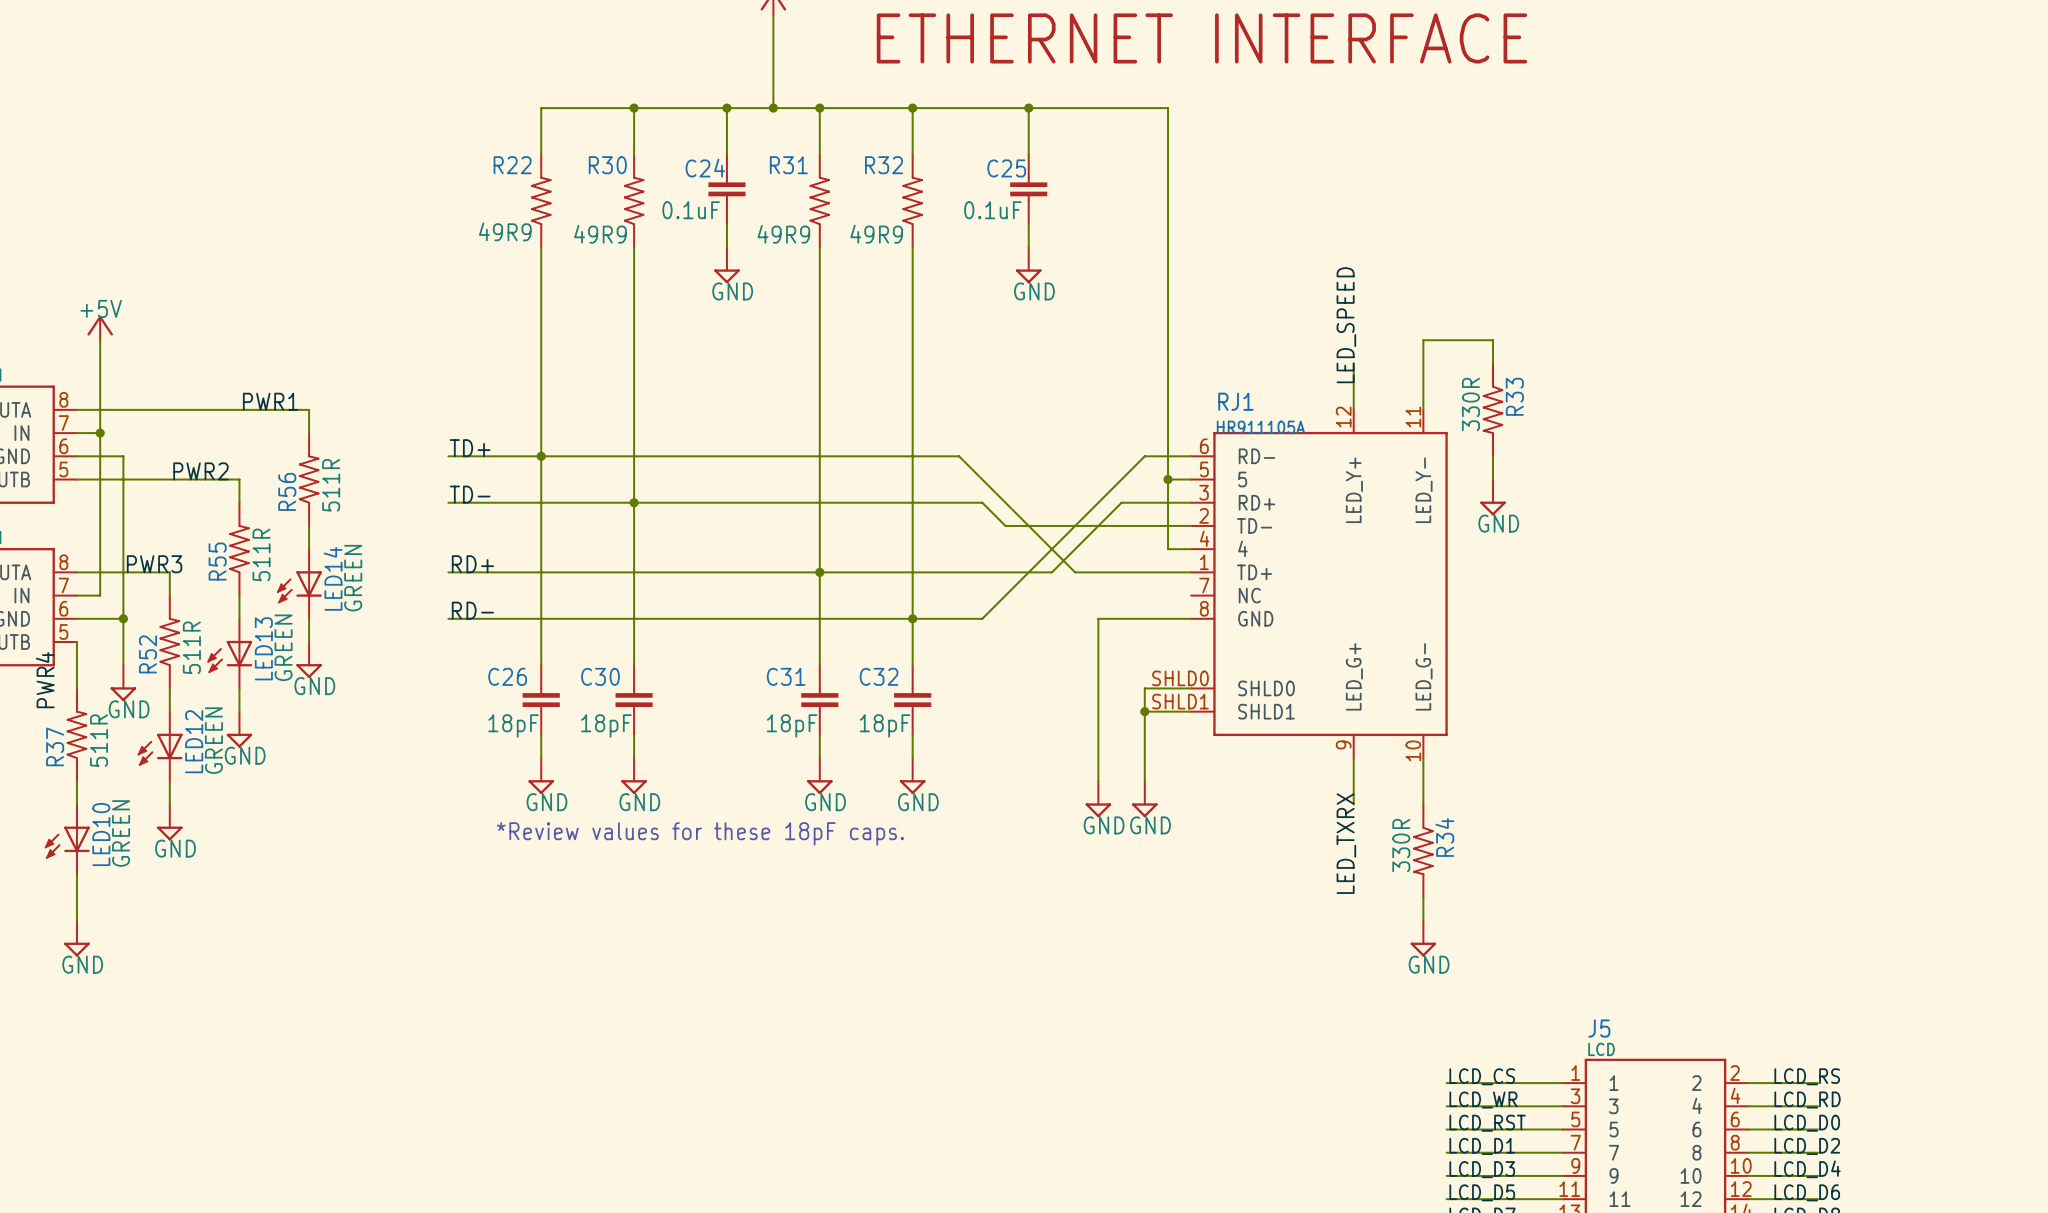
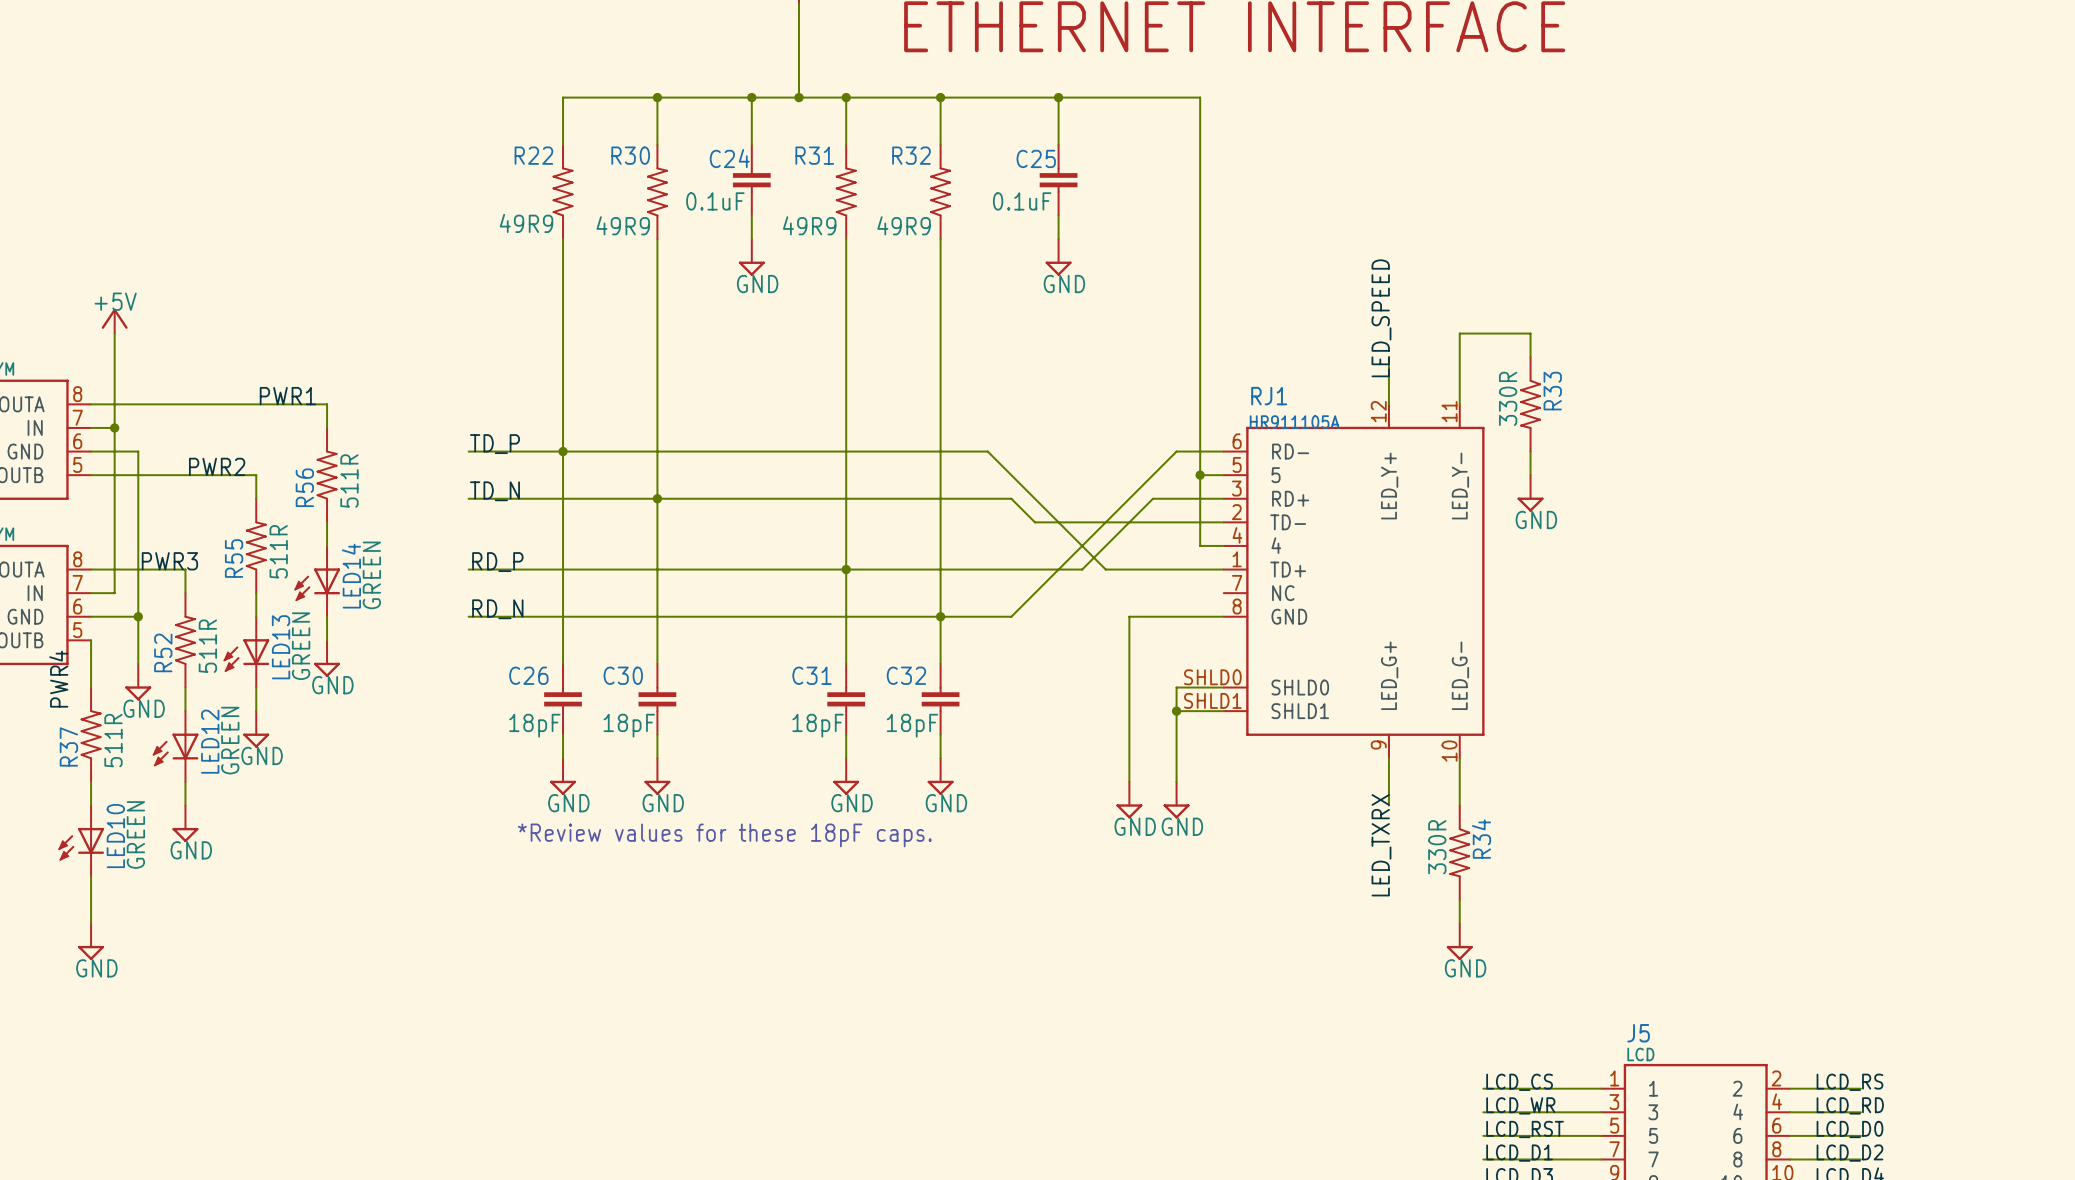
label: TD+ (470, 448) -> TD_P (494, 444)
label: TD- (470, 494) -> TD_N (494, 491)
label: RD+ (472, 564) -> RD_P (497, 562)
label: RD- (472, 610) -> RD_N (497, 609)

